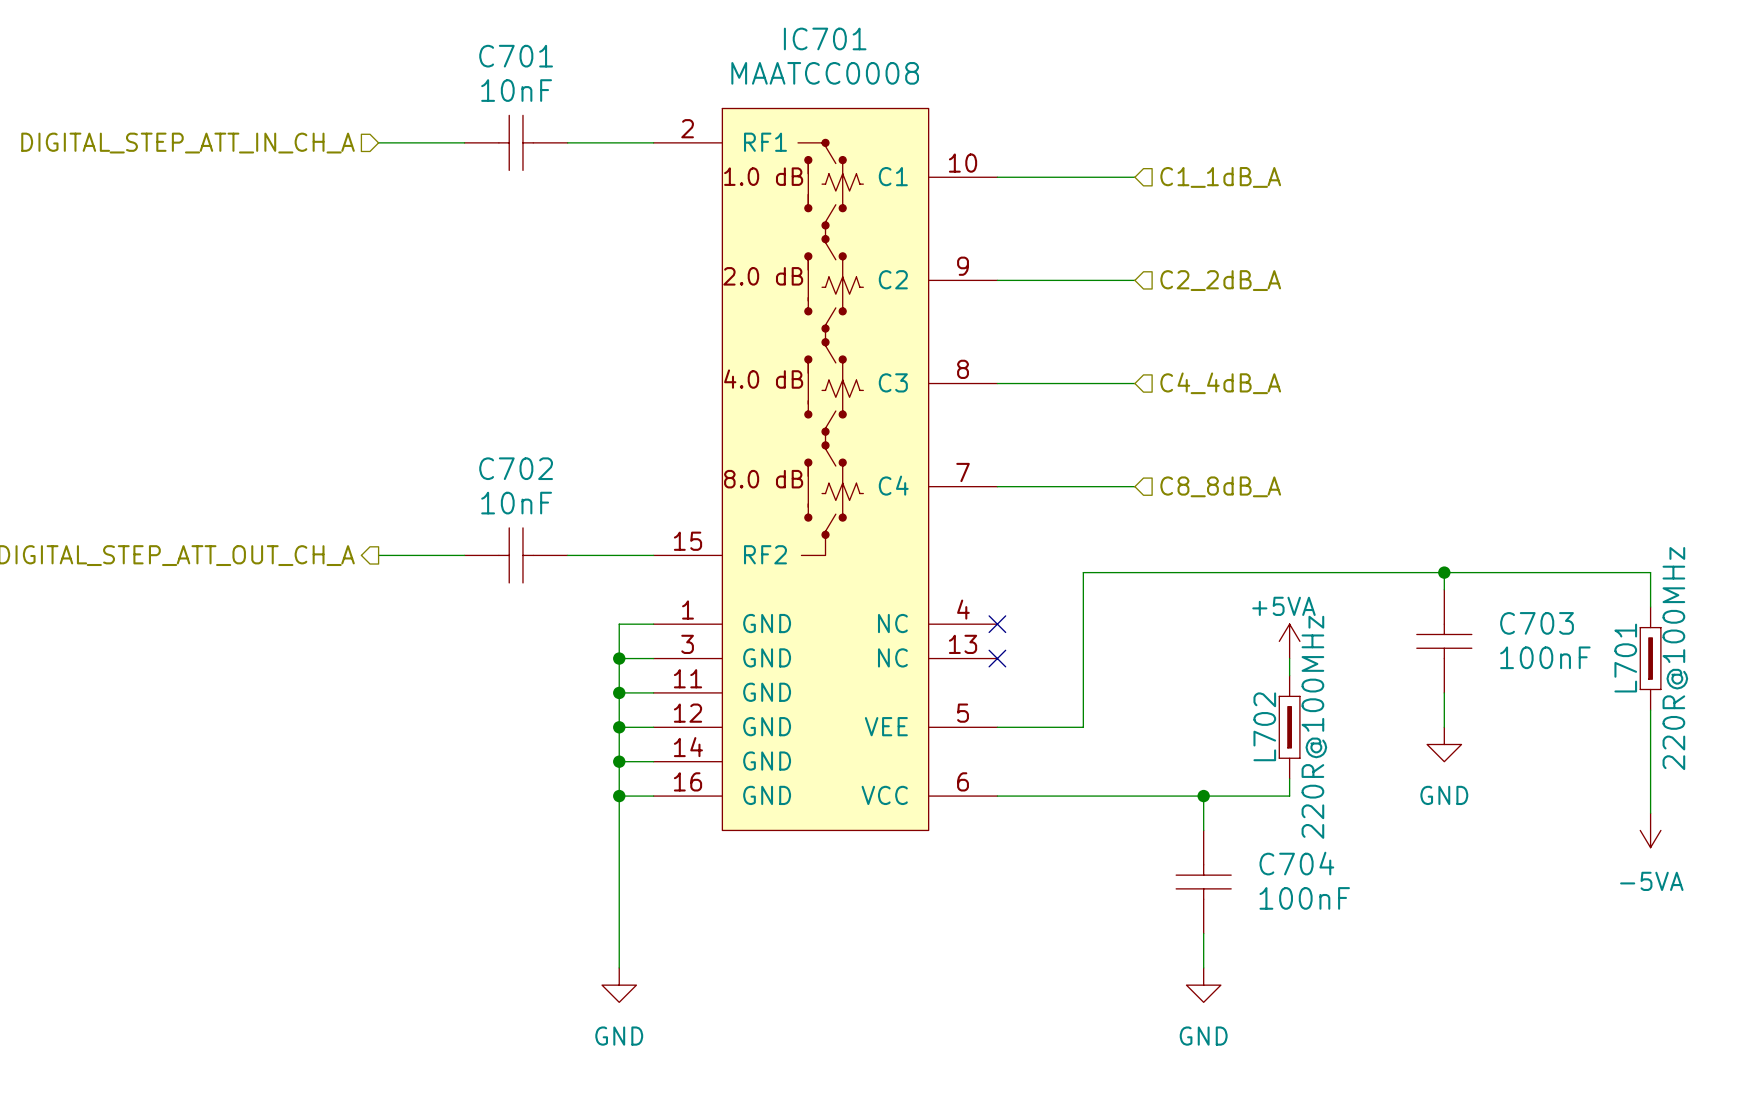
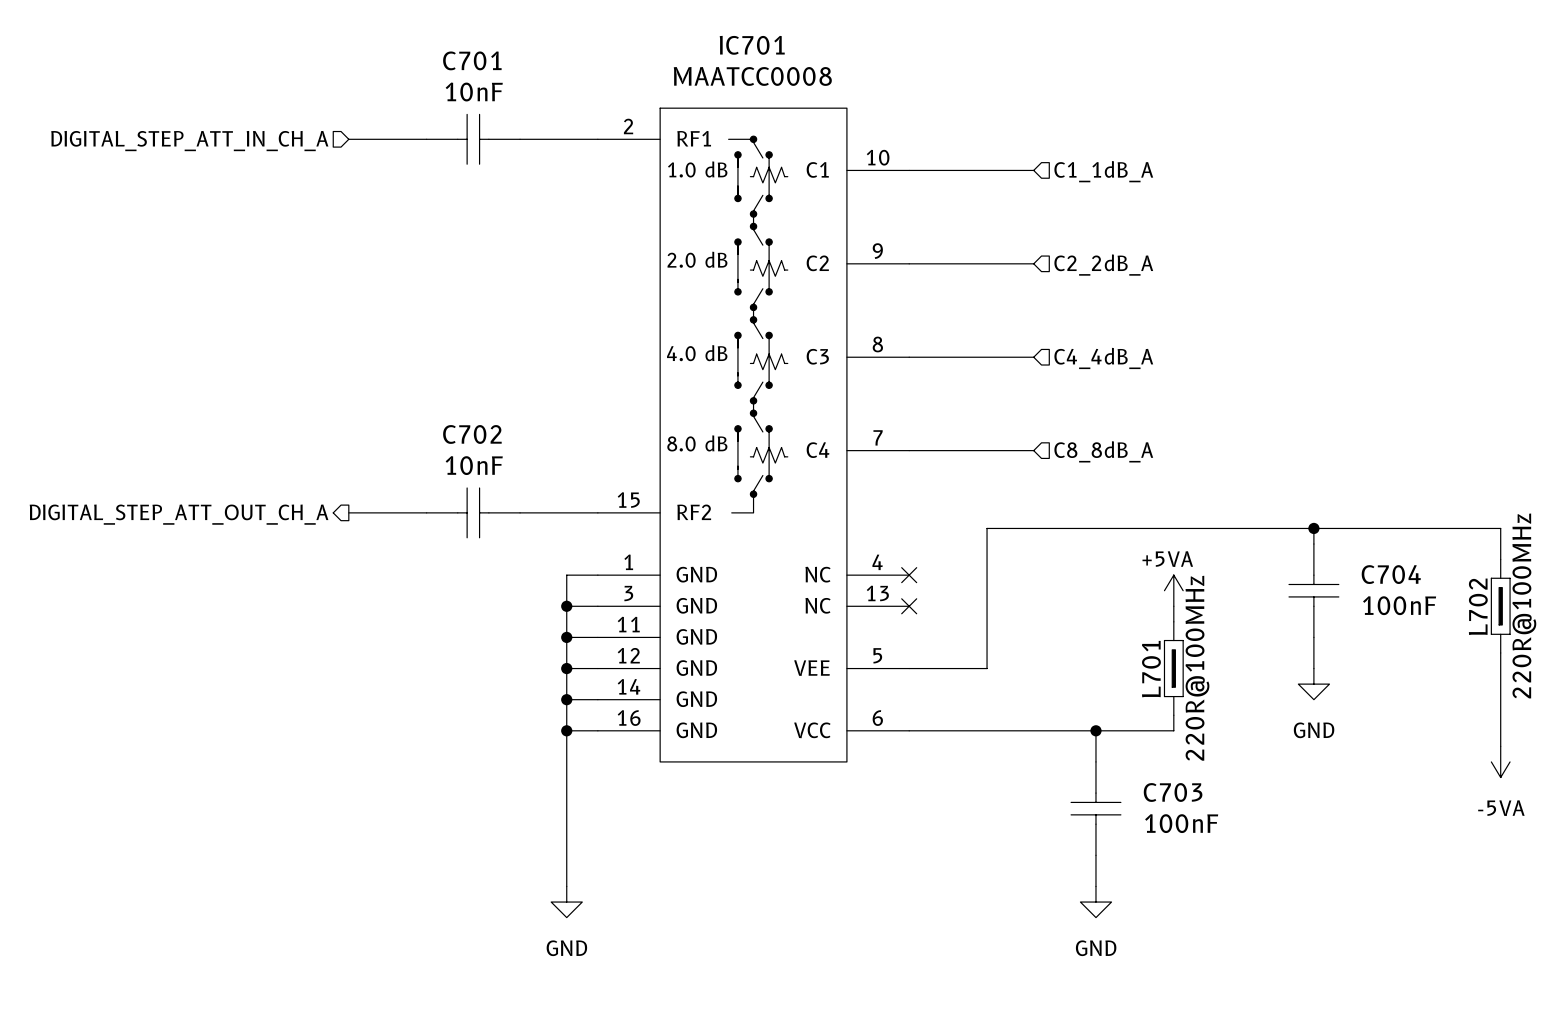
C703 name: C703 (1537, 623) -> C704 (1391, 574)
L701 name: L701 (1625, 658) -> L702 (1478, 606)
L702 name: L702 (1264, 726) -> L701 (1151, 669)
C704 name: C704 (1296, 863) -> C703 (1173, 792)

